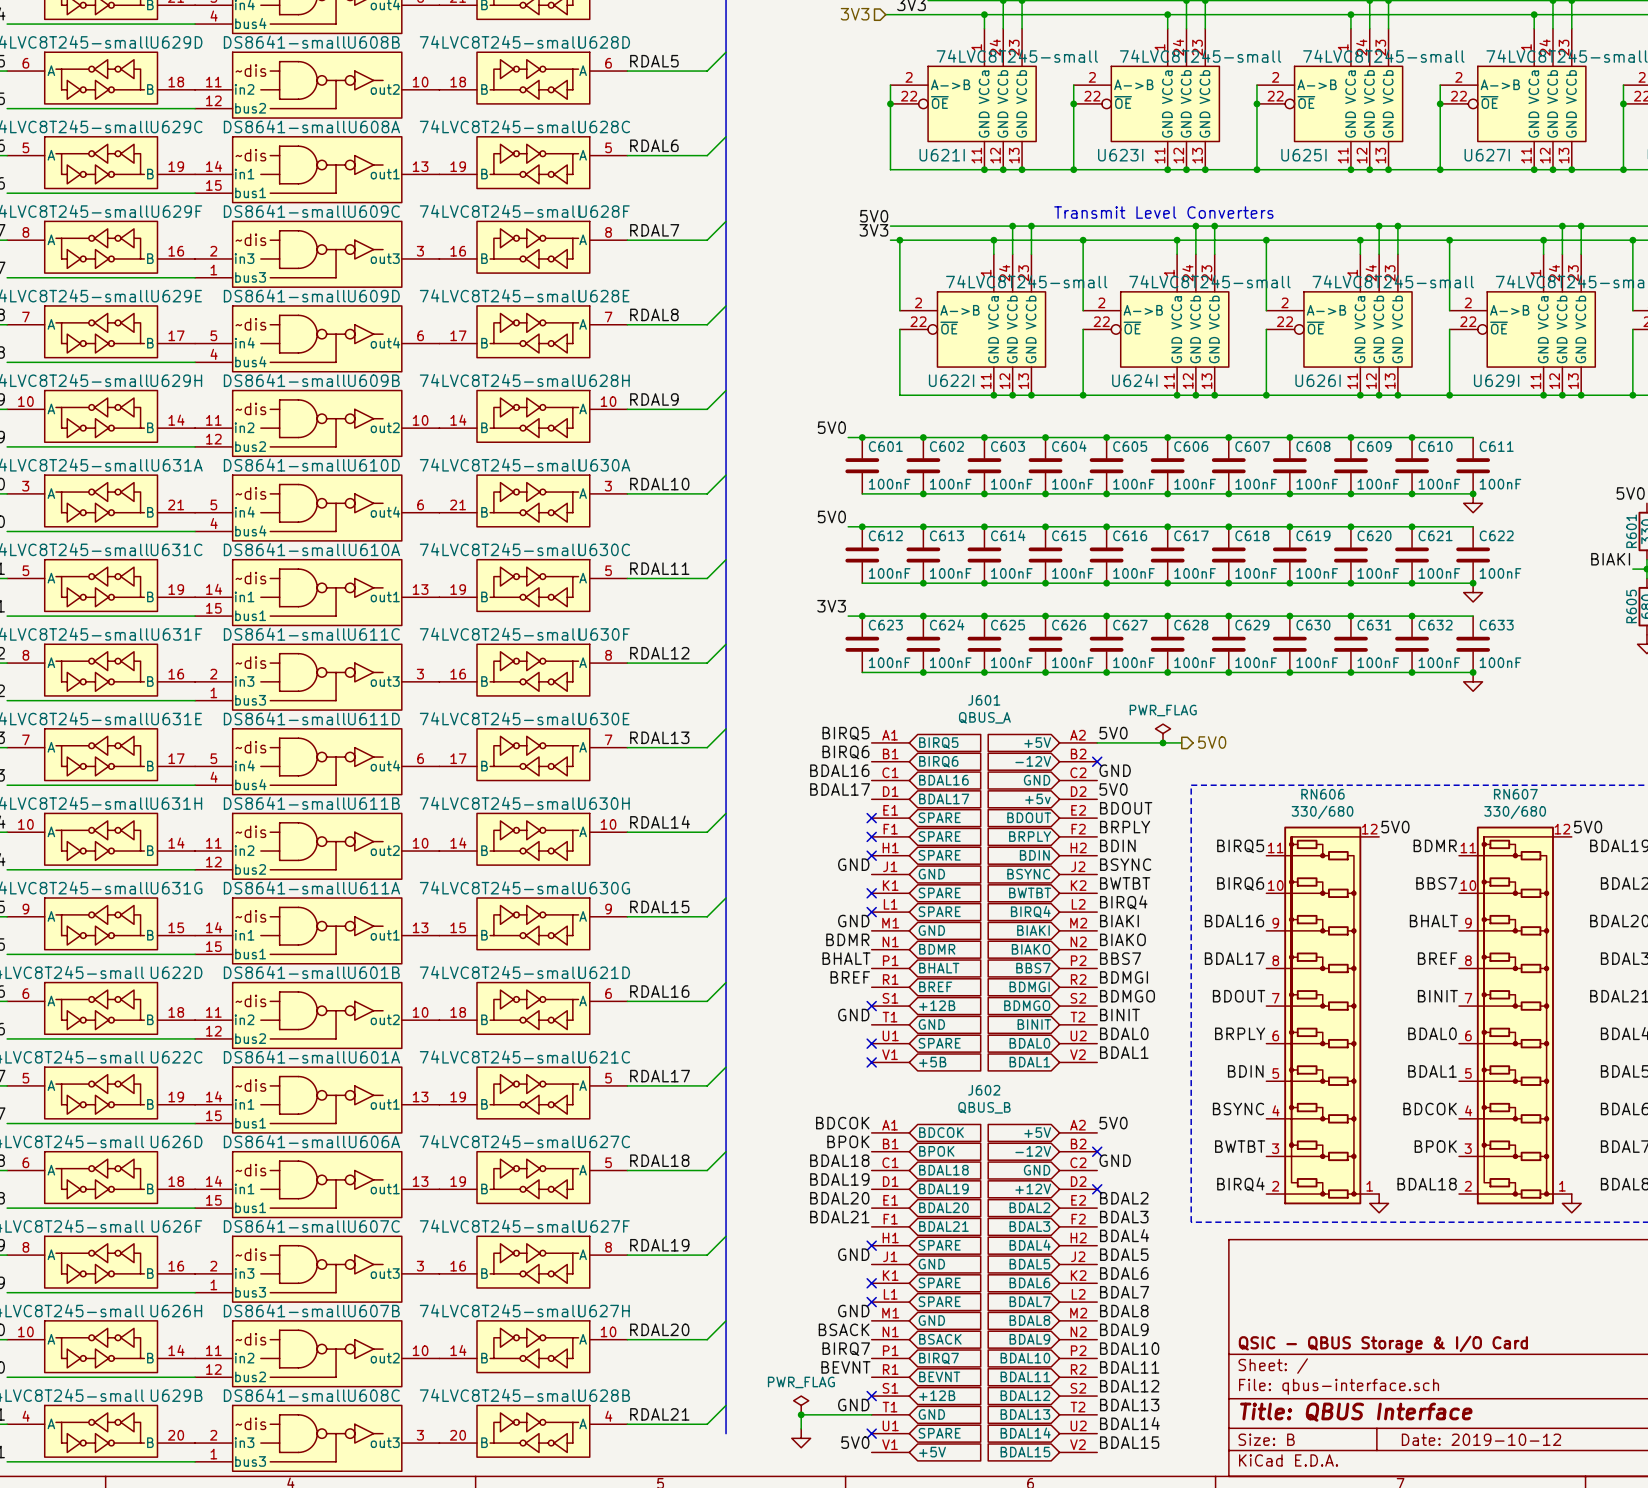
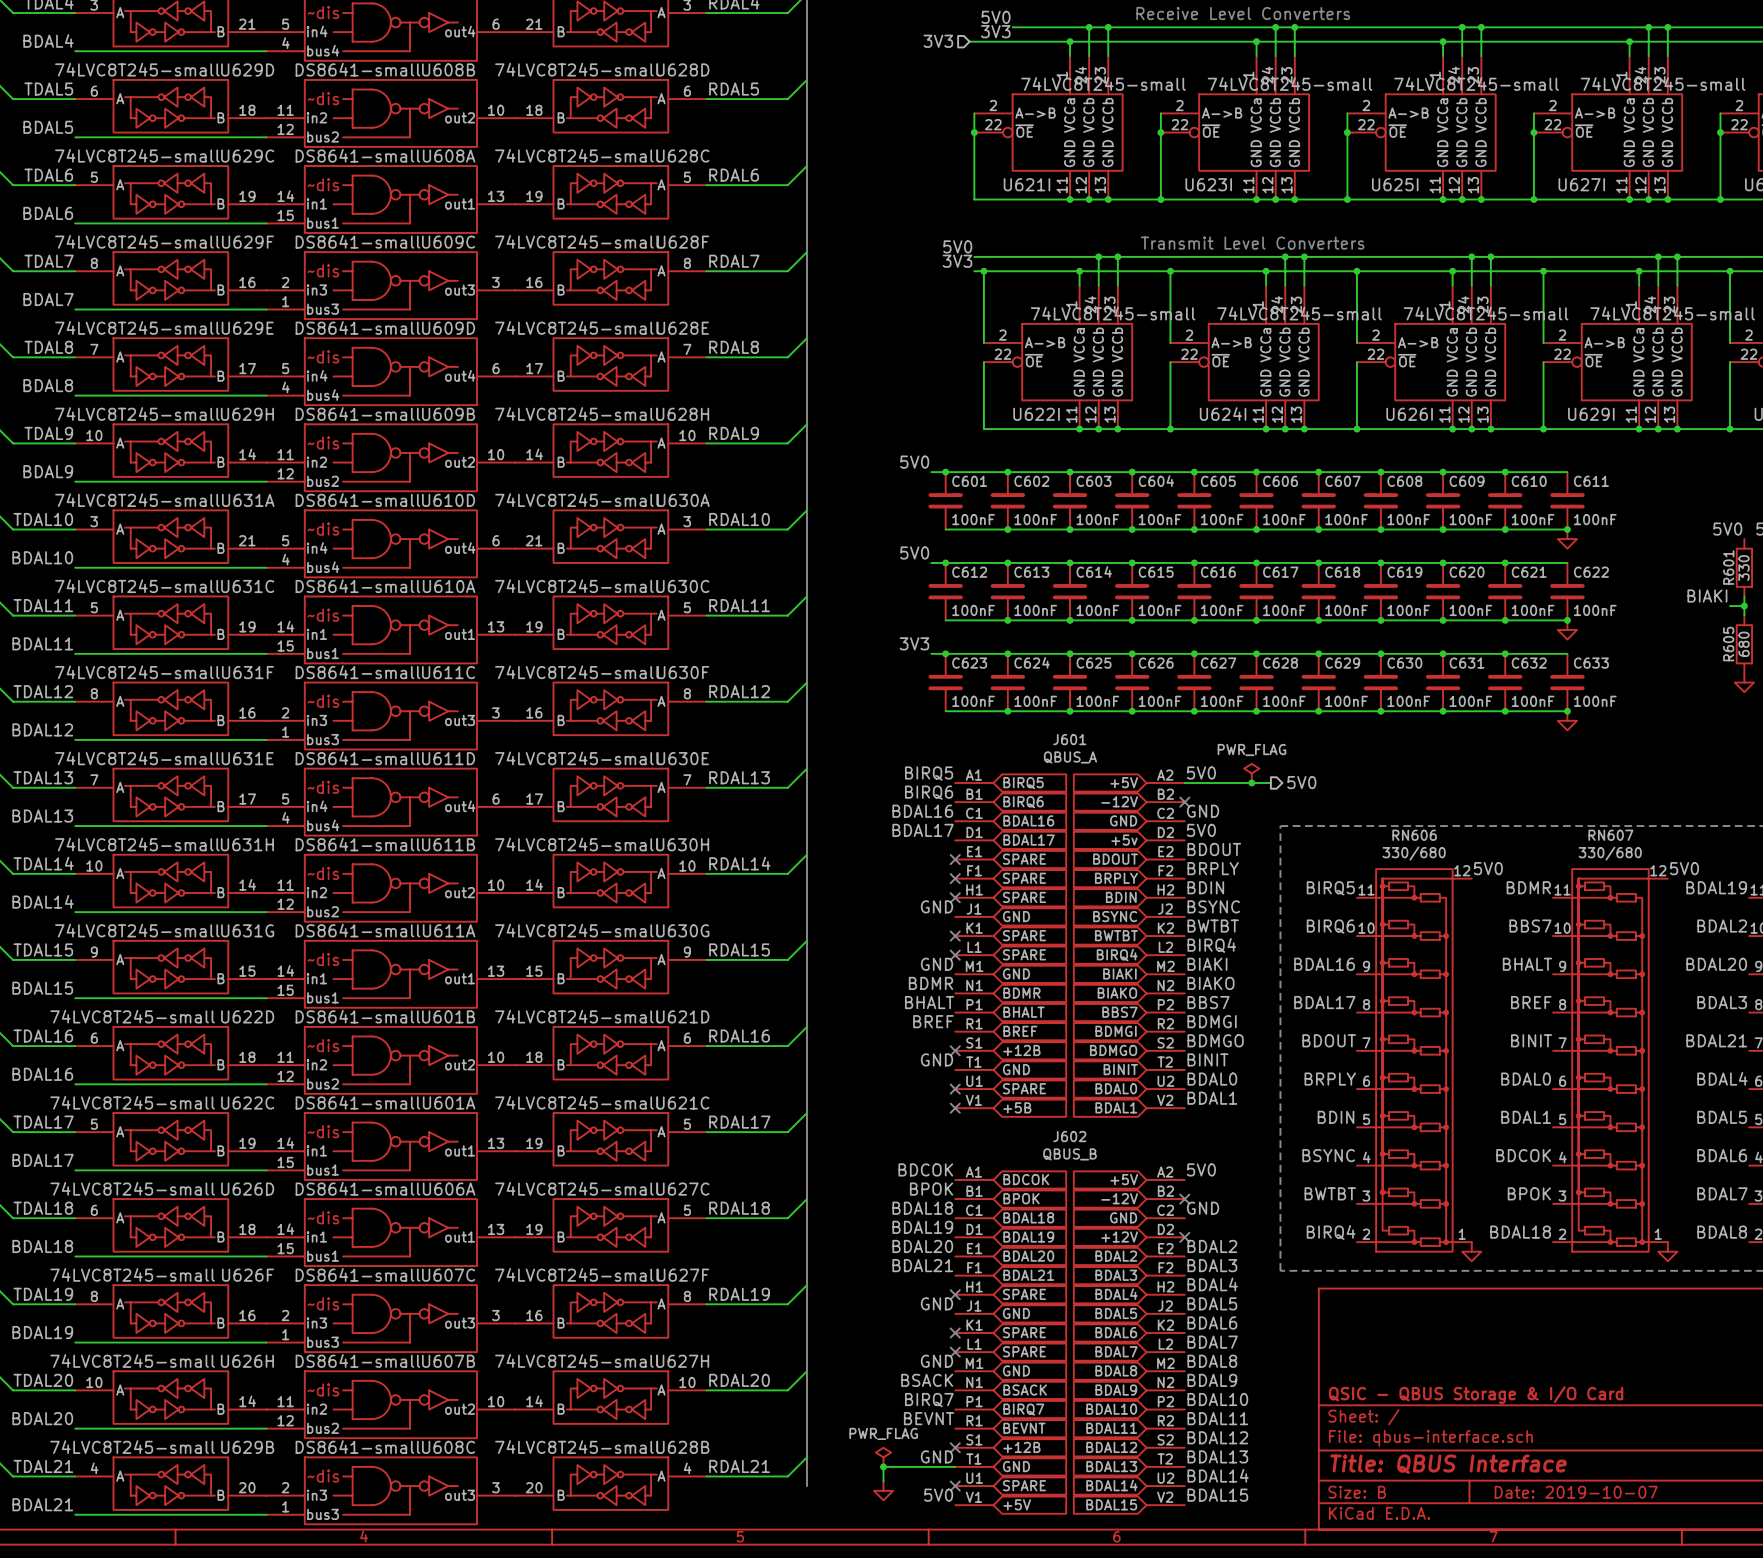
title block: Date: 2019-10-12 (1481, 1439) -> Date: 2019-10-07 (1576, 1492)

